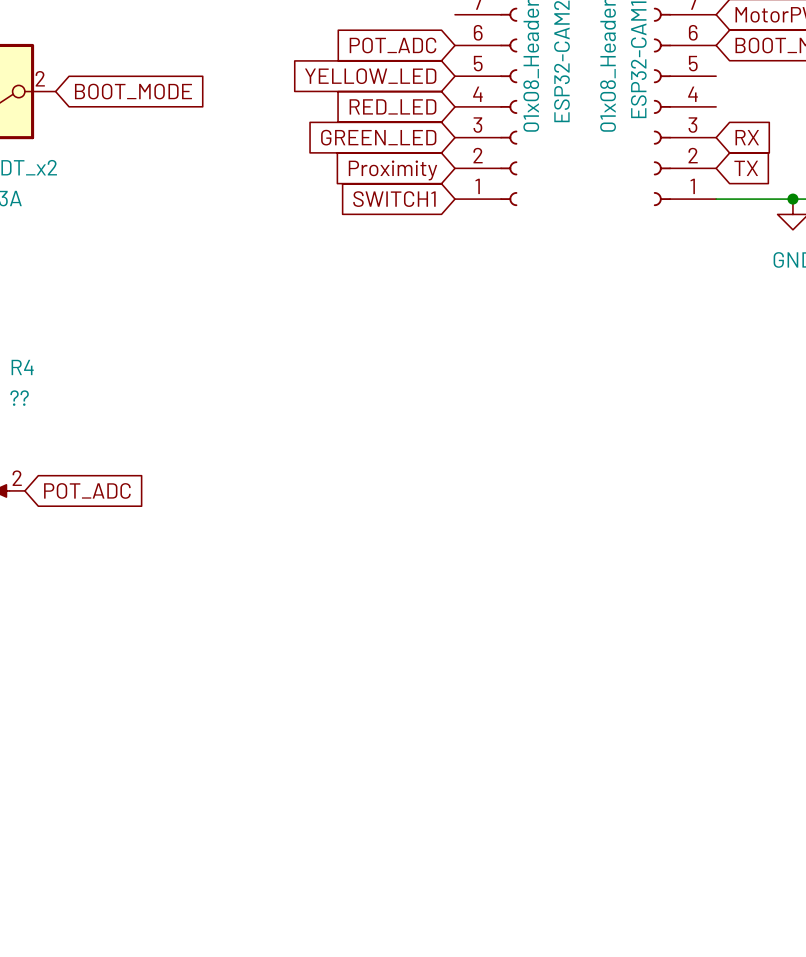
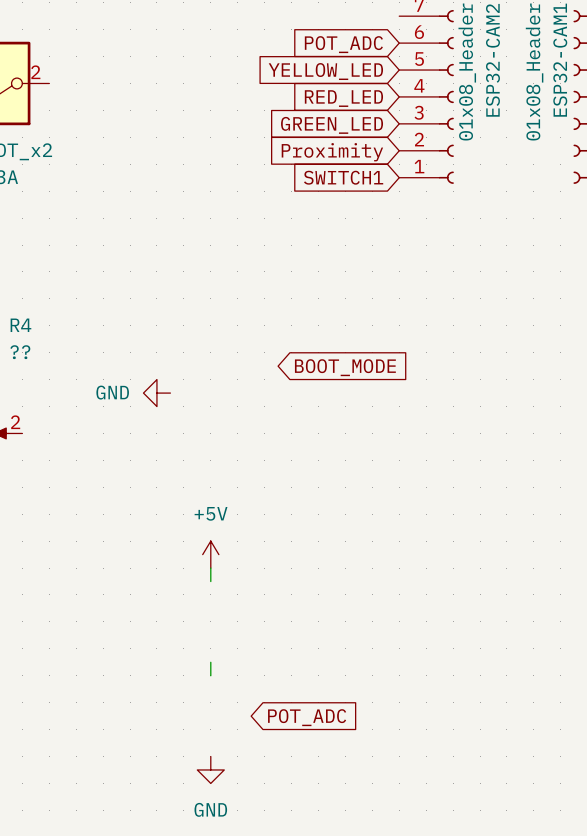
global label: BOOT_MODE (133, 91) -> none
global label: none -> BOOT_MODE (345, 367)
power symbol: none -> GND (156, 393)
global label: POT_ADC (87, 490) -> none
power symbol: none -> +5V (210, 554)
wire: none -> (210, 568) (210, 581)
wire: none -> (210, 662) (210, 675)
global label: none -> POT_ADC (307, 717)
power symbol: none -> GND (210, 769)

